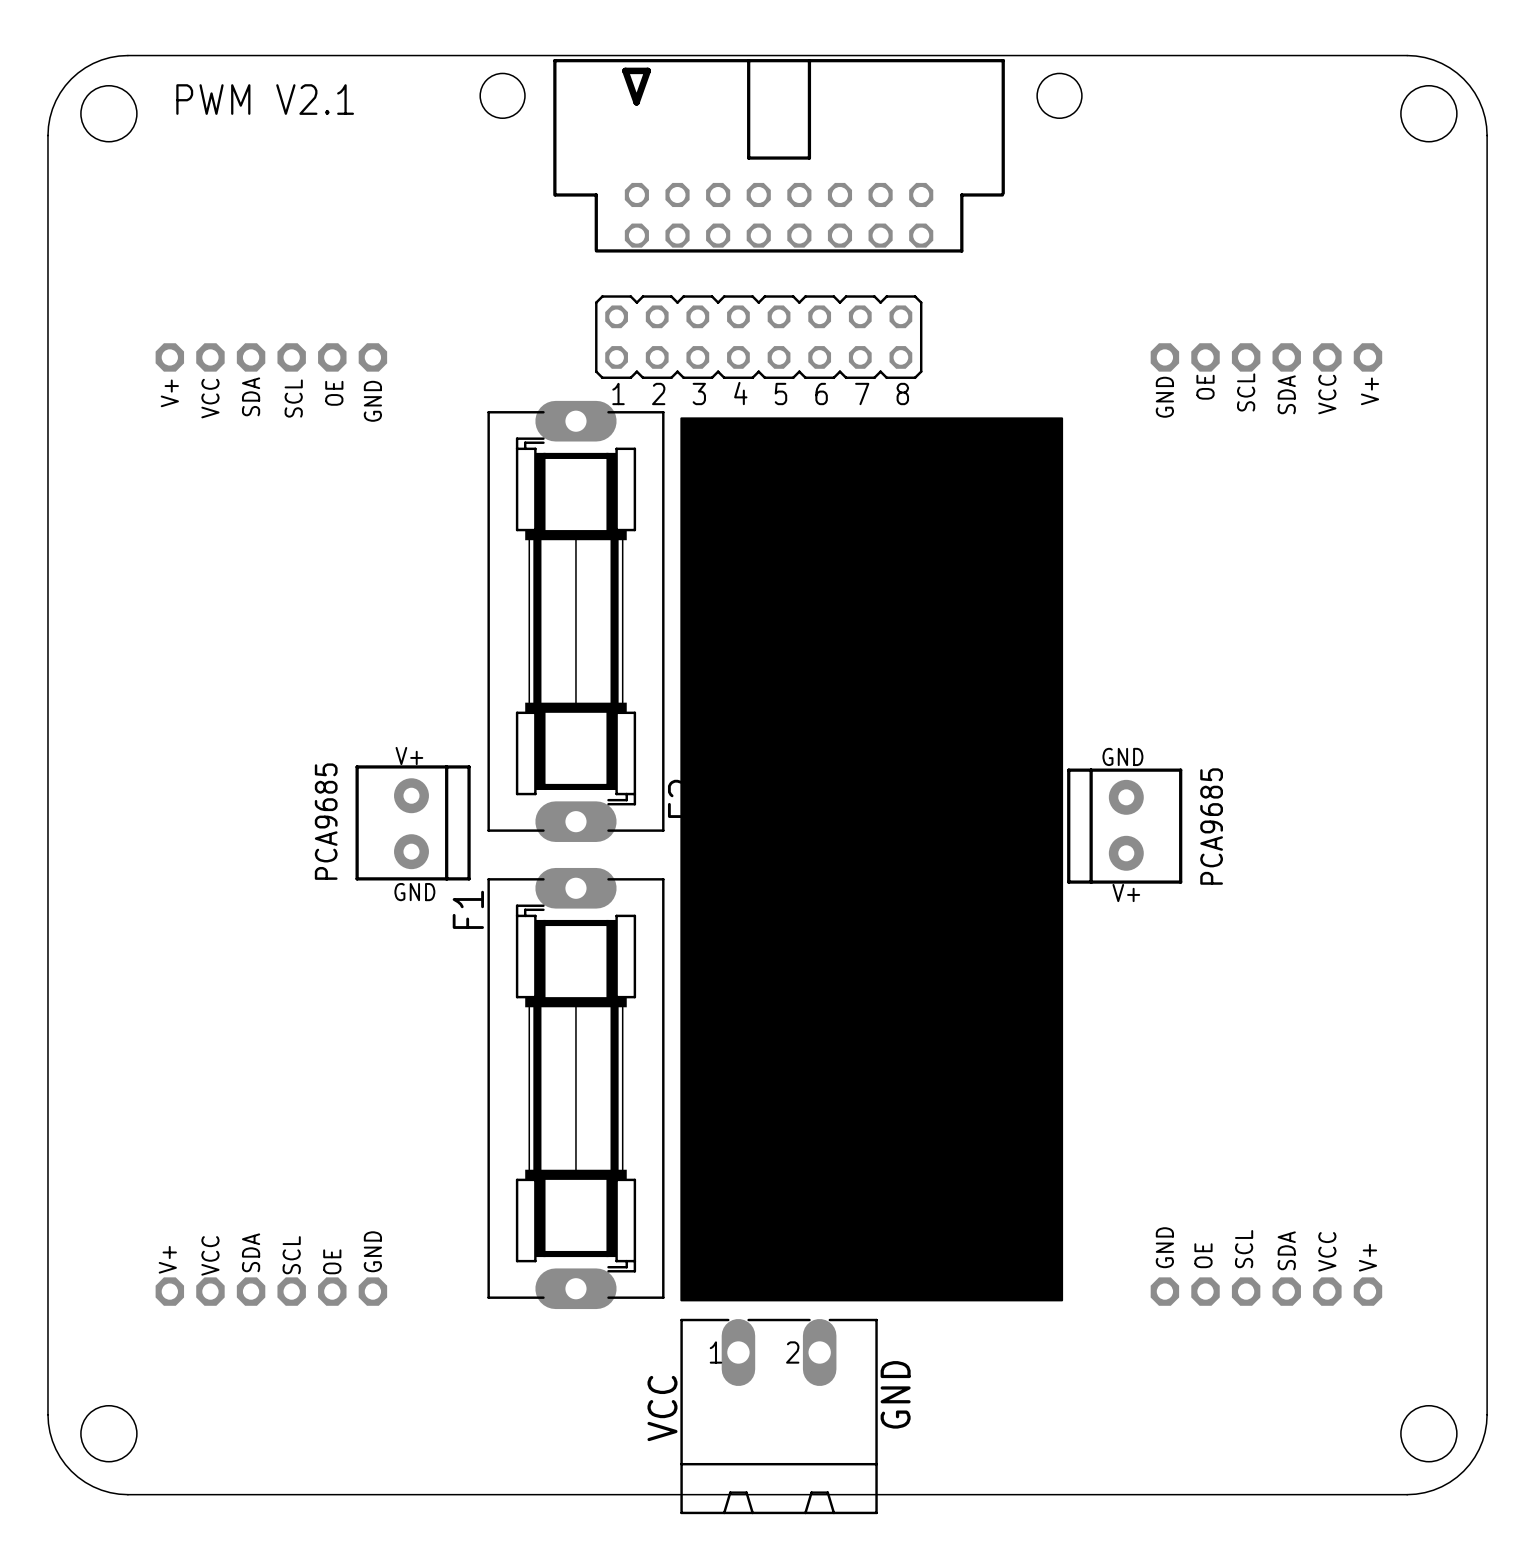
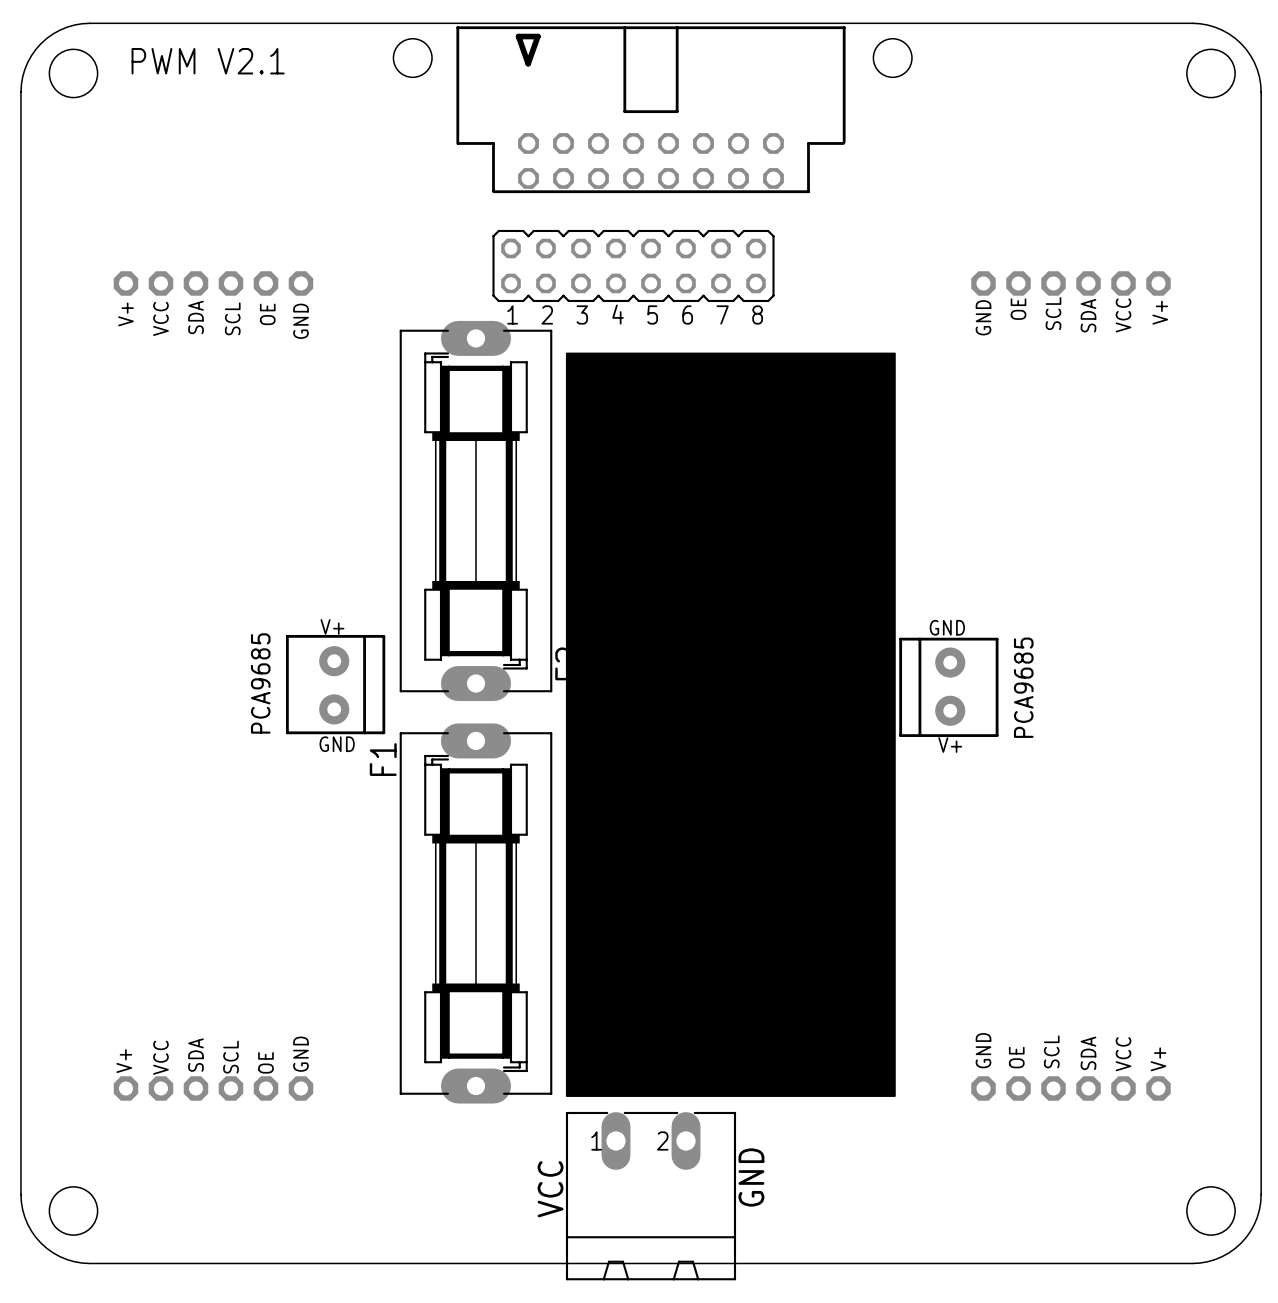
part footprint: [680, 417, 1064, 1302] -> [565, 352, 896, 1097]

